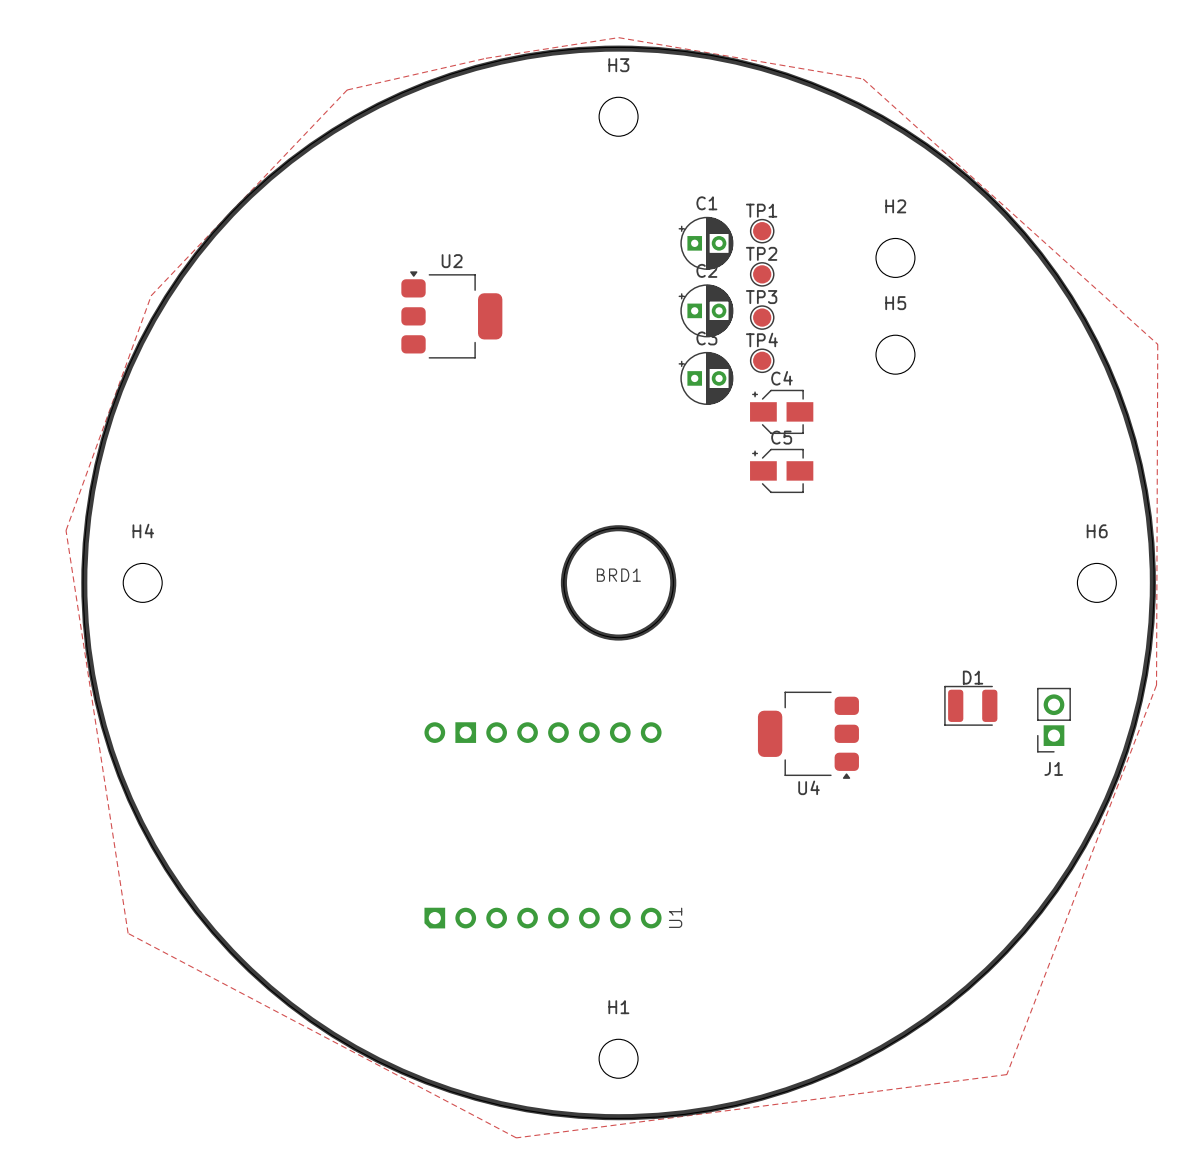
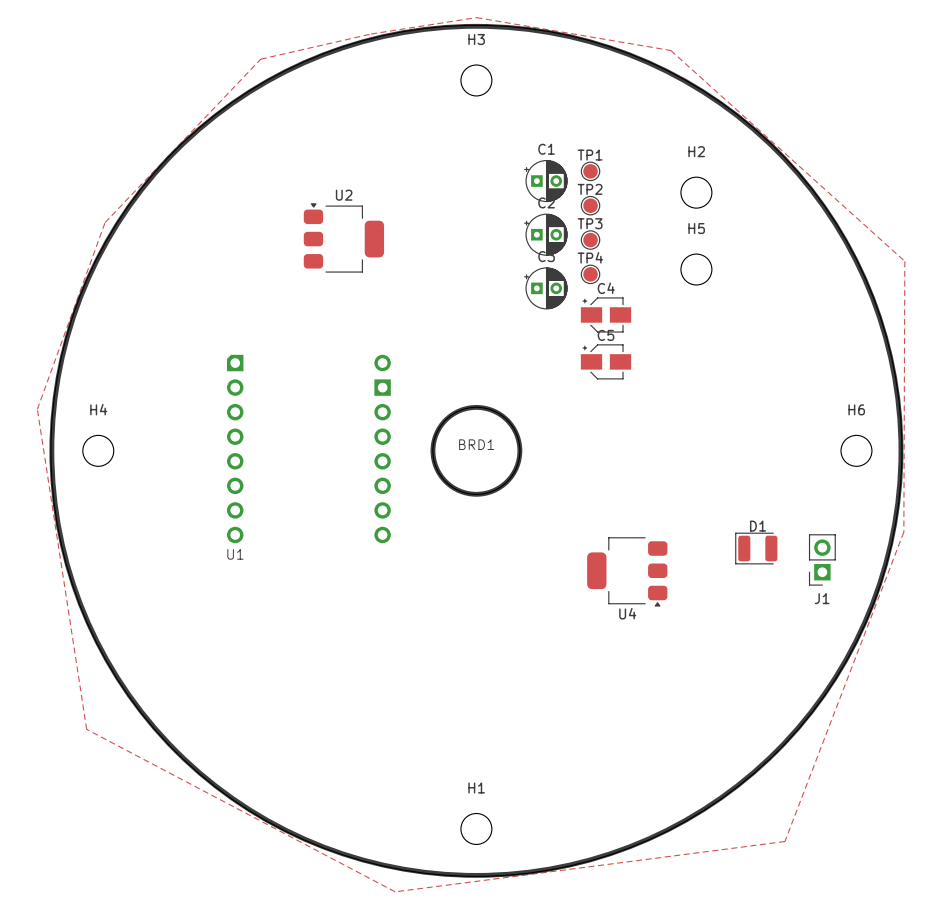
U1 rotation: 0° (543, 825) -> 90° clockwise (308, 449)
U1 position: (543, 825) -> (308, 449)

